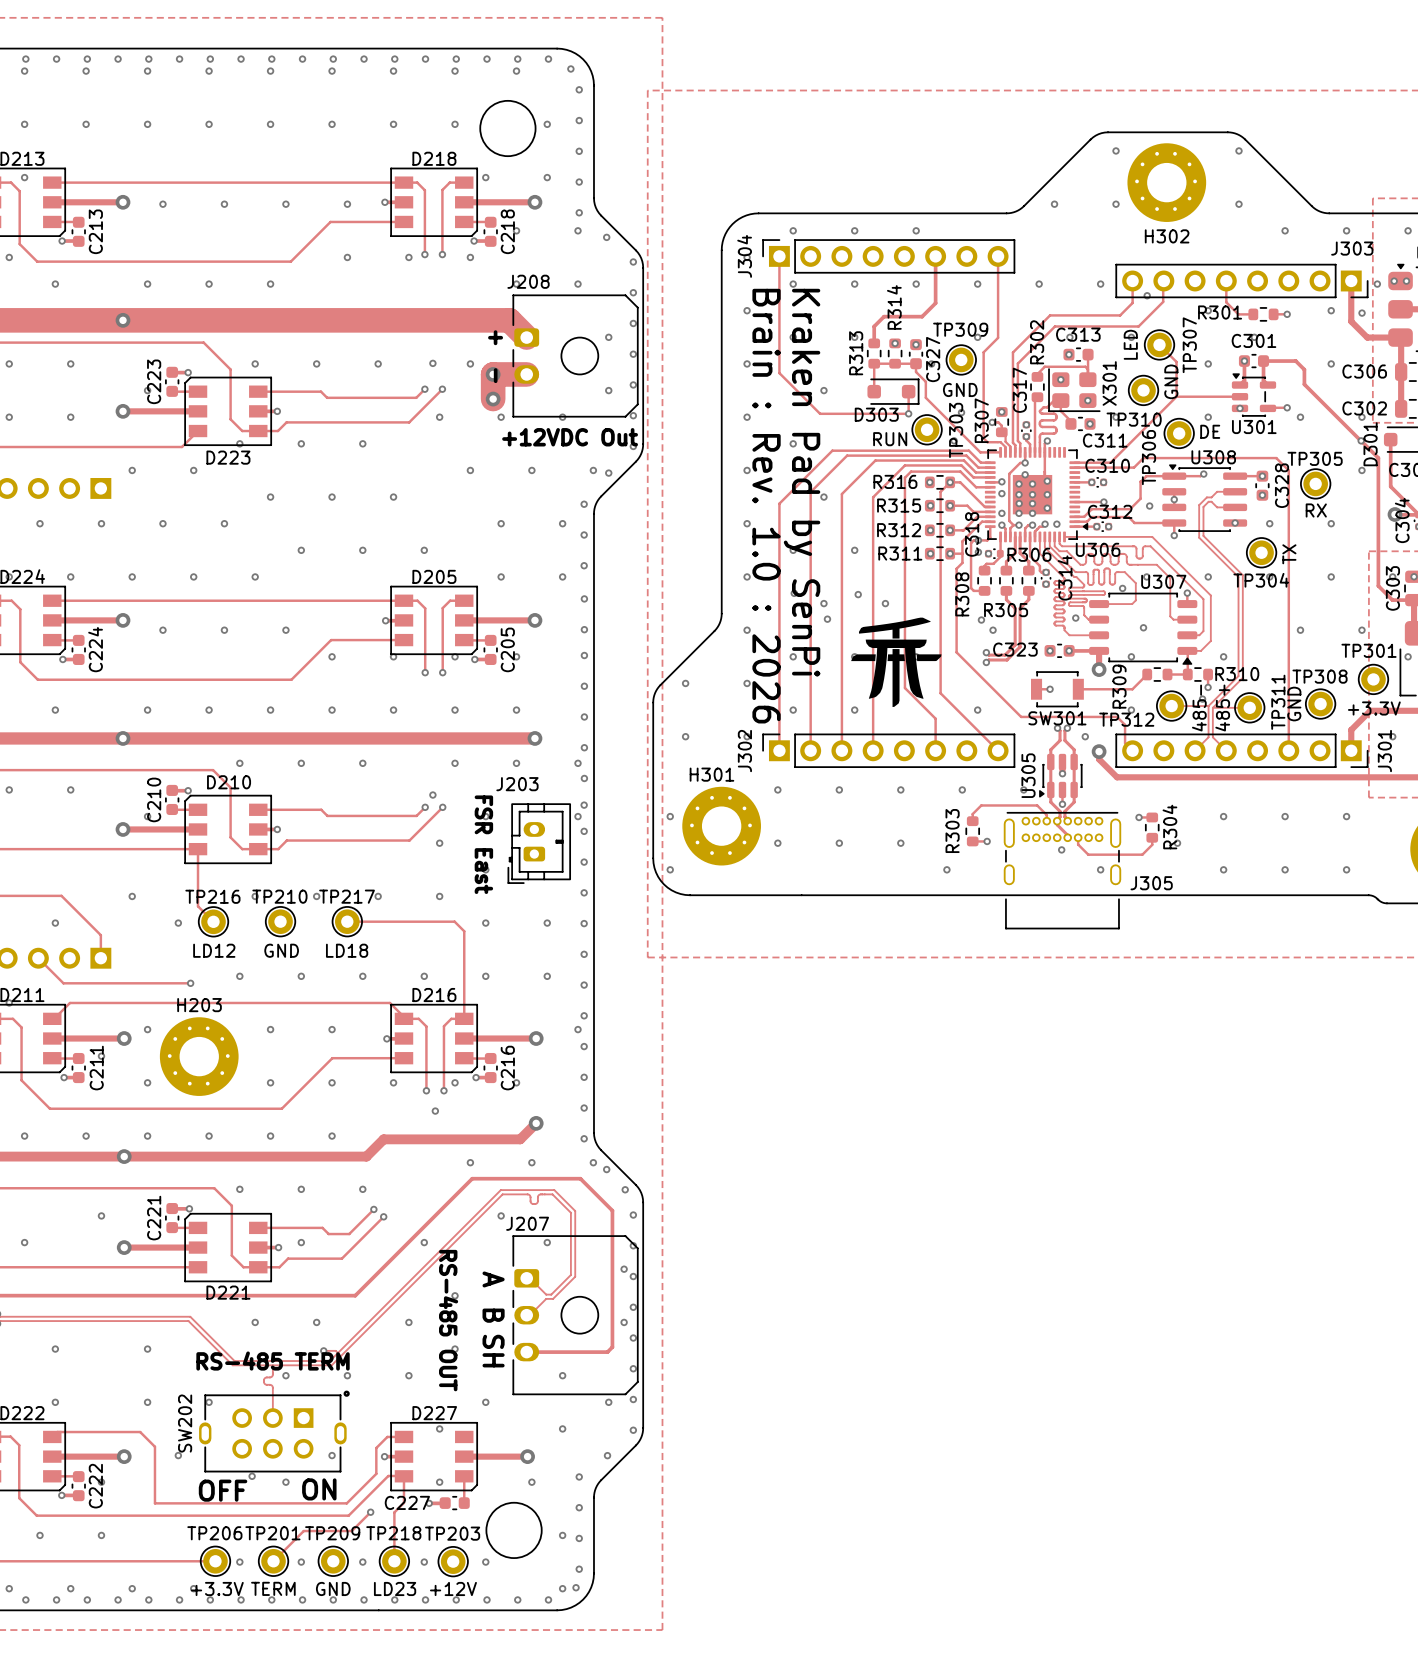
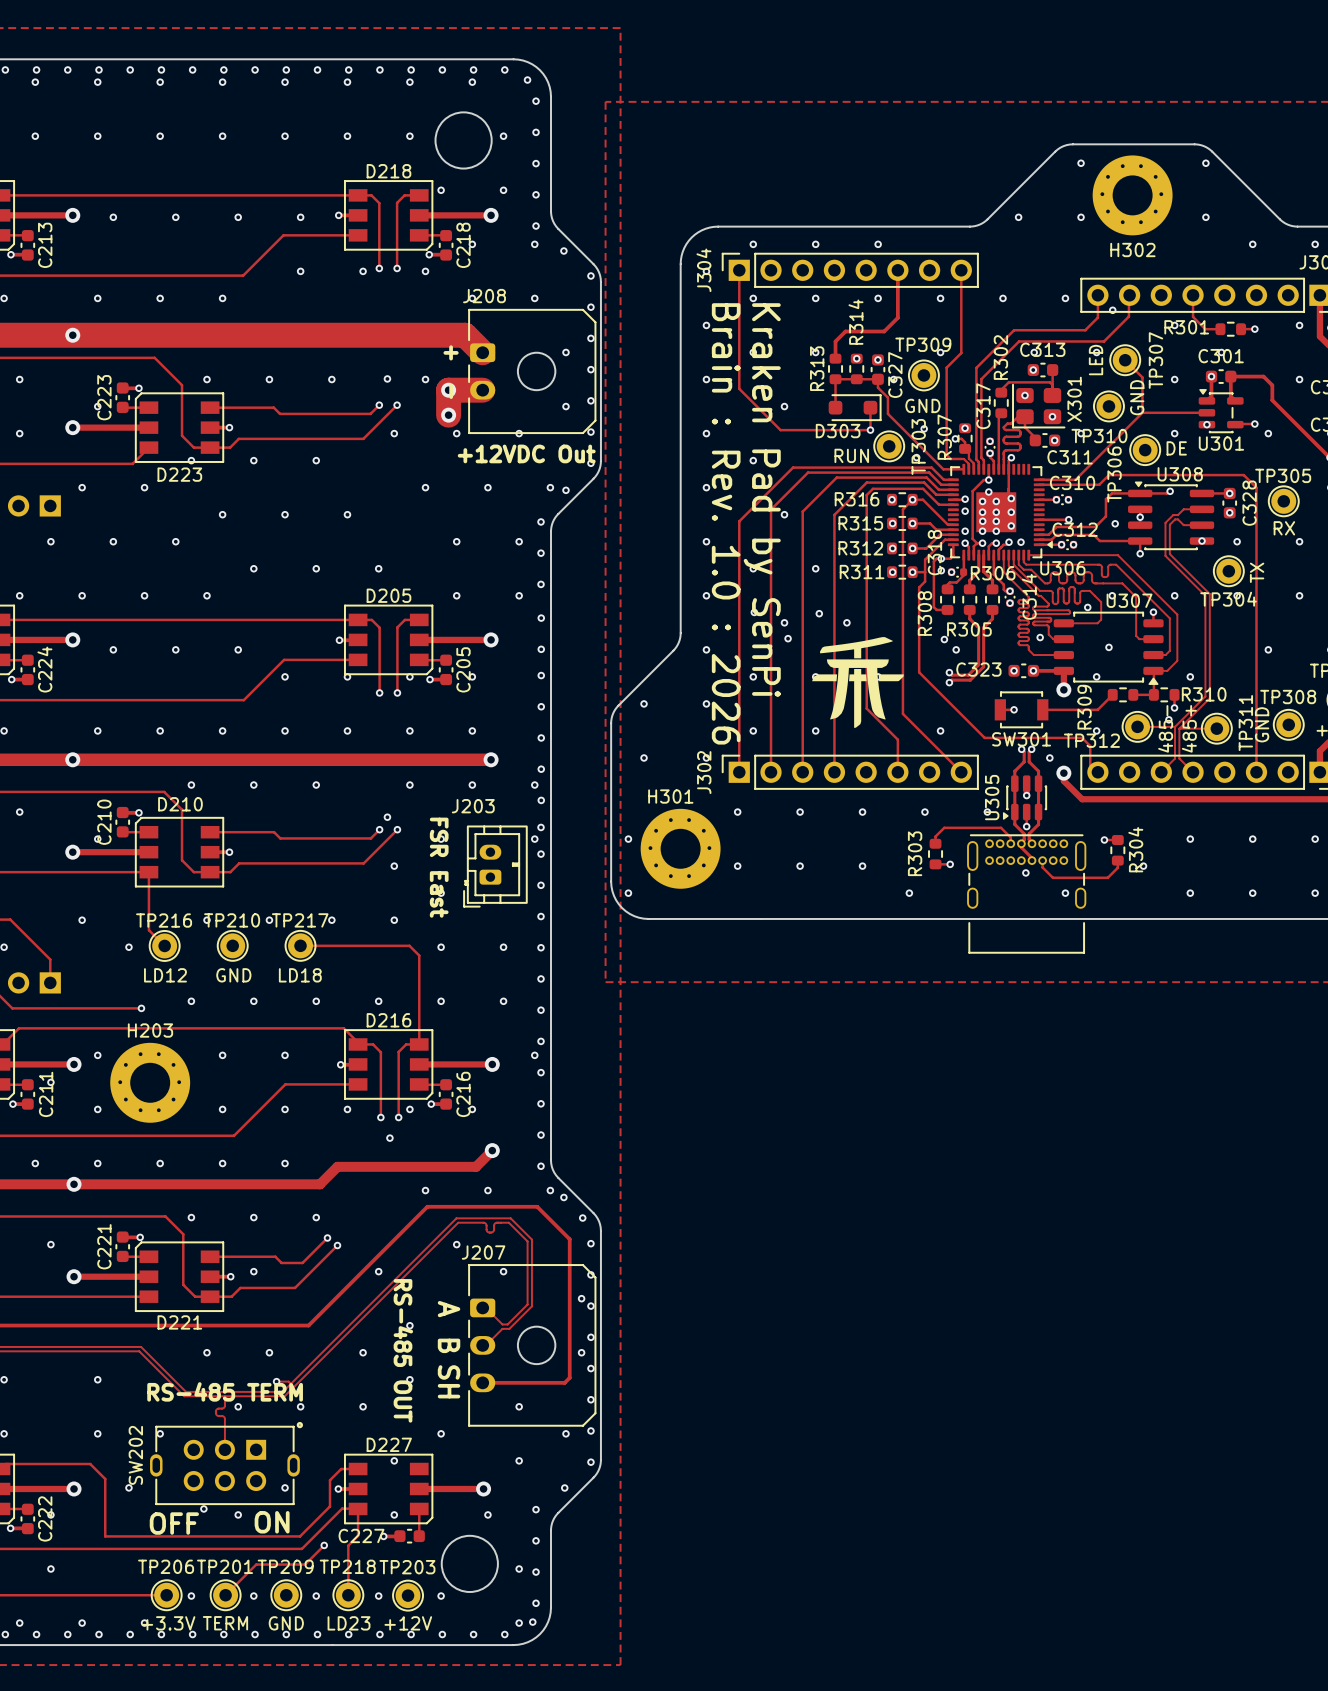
J305 name: J305 (1151, 883) -> none

